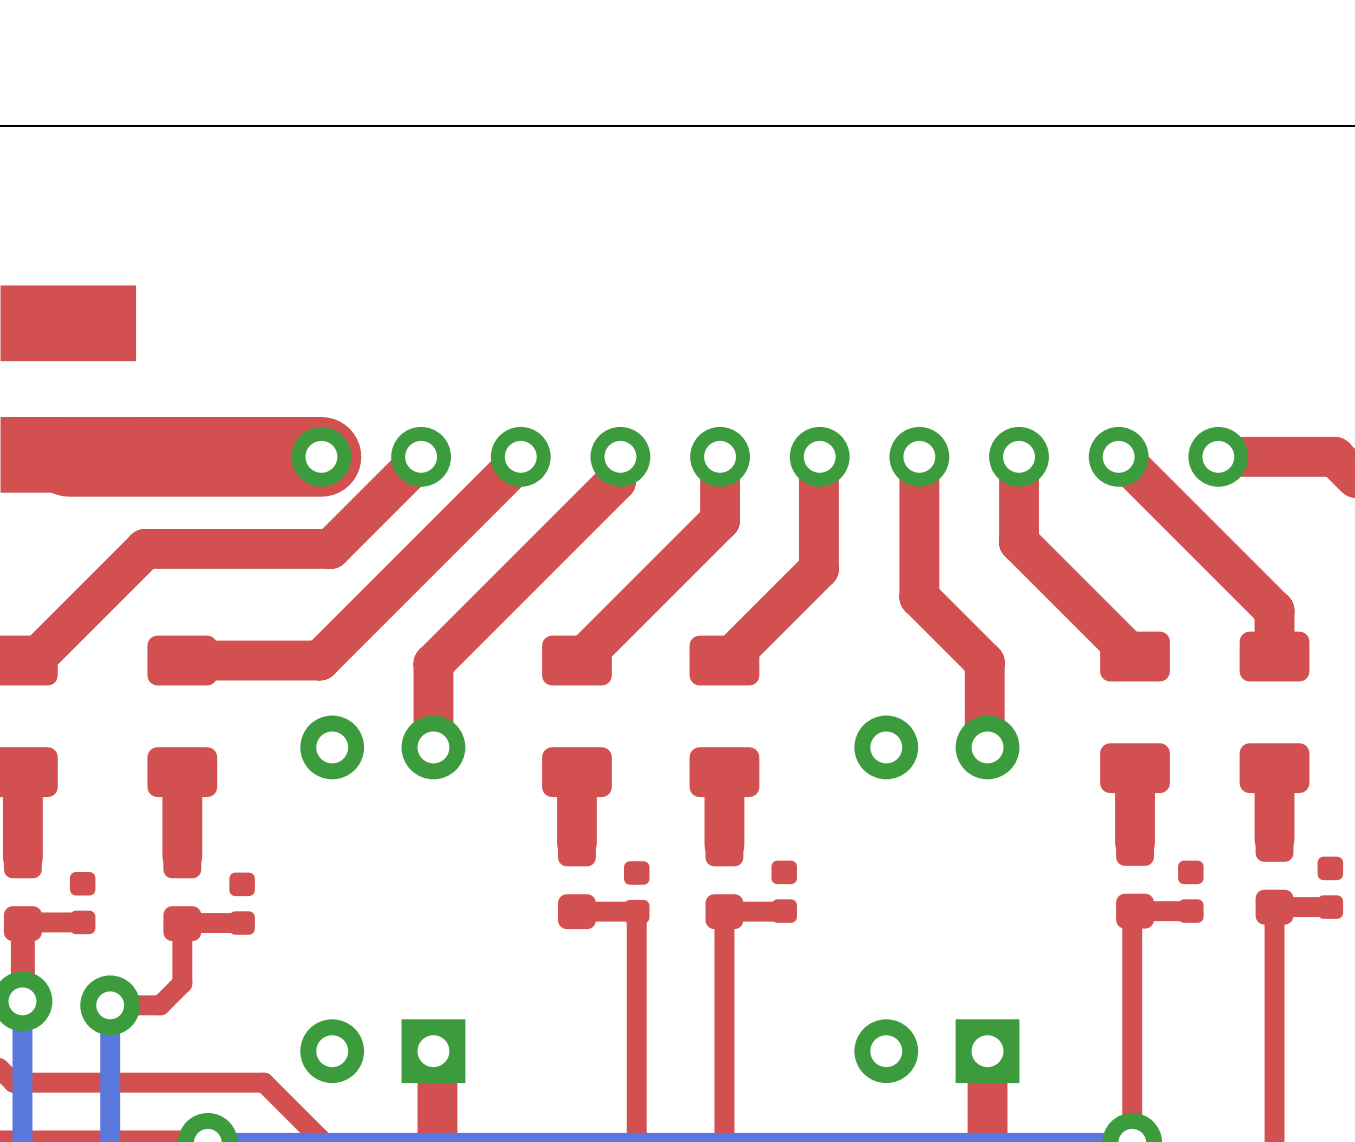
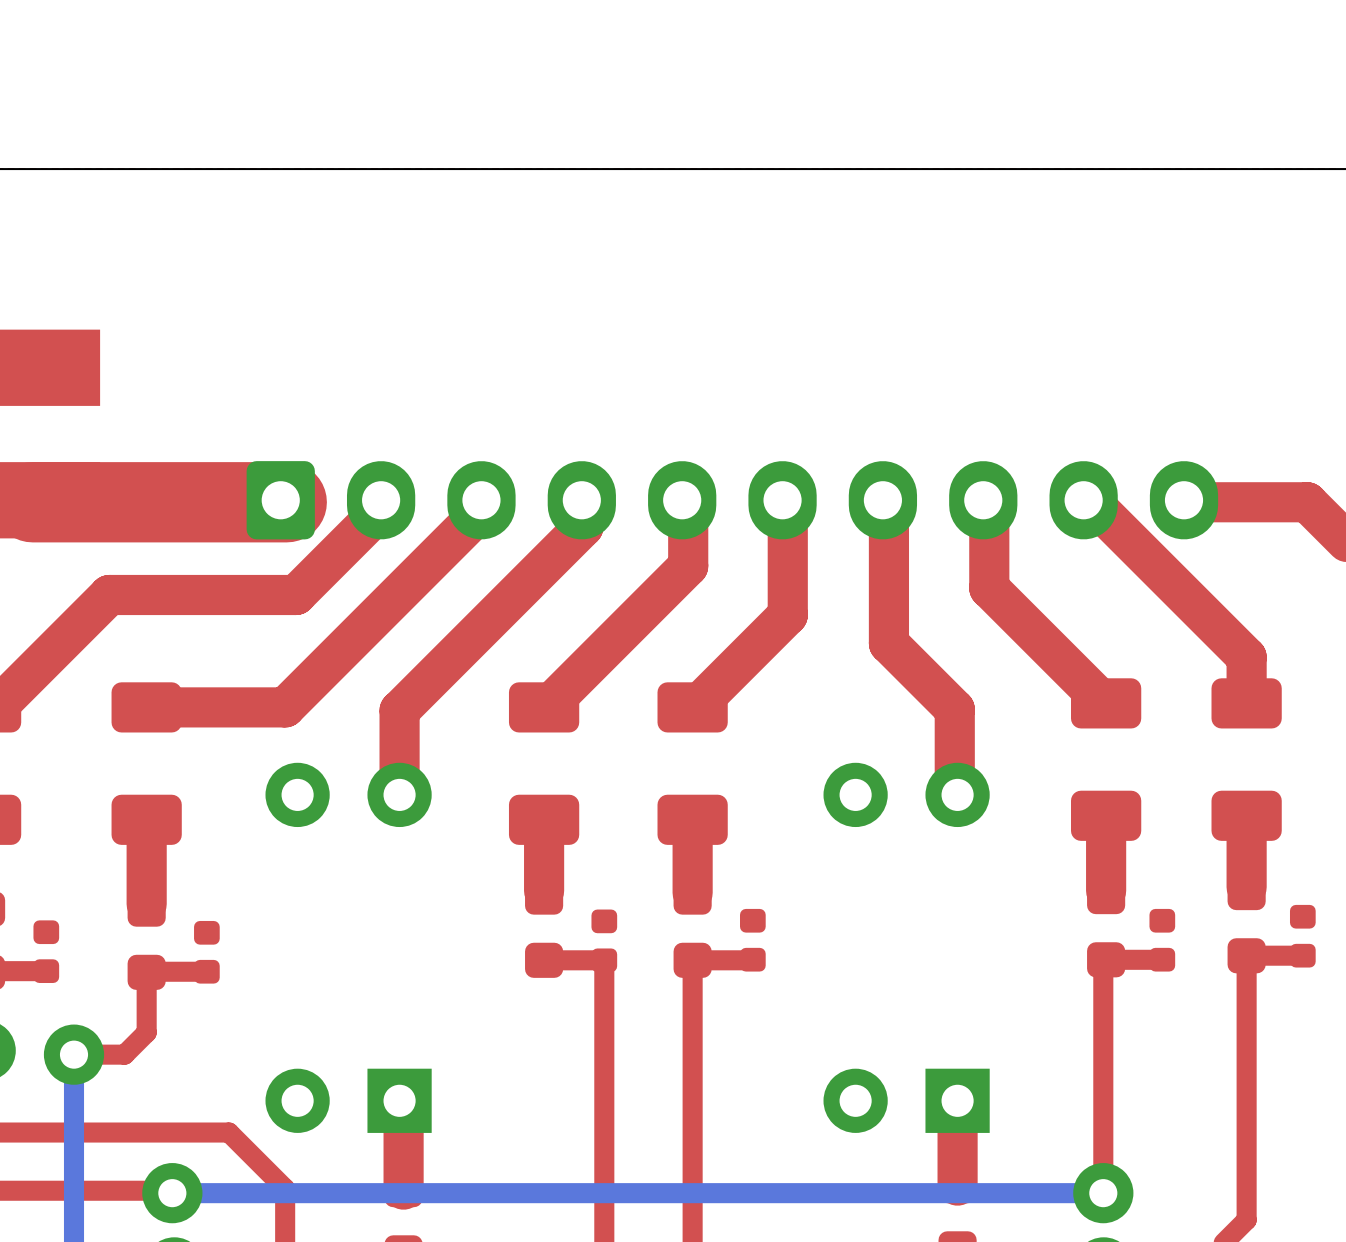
part footprint: [291, 426, 1249, 487] -> [246, 461, 1219, 540]

